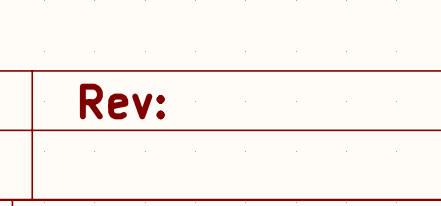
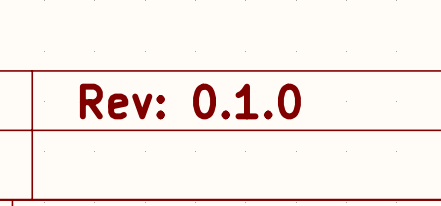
title block: Rev: (122, 101) -> Rev: 0.1.0 (190, 101)

